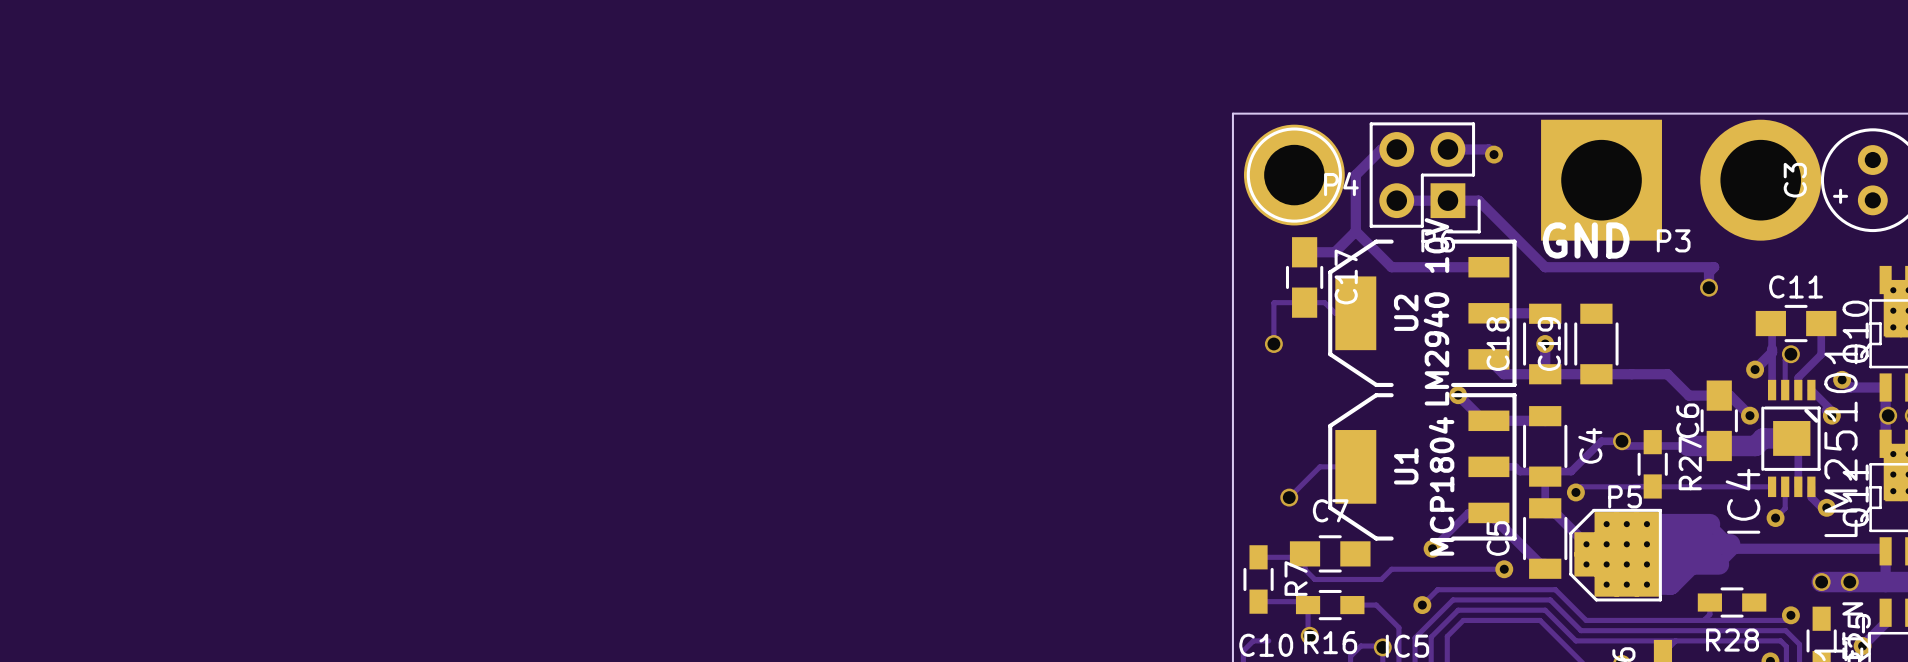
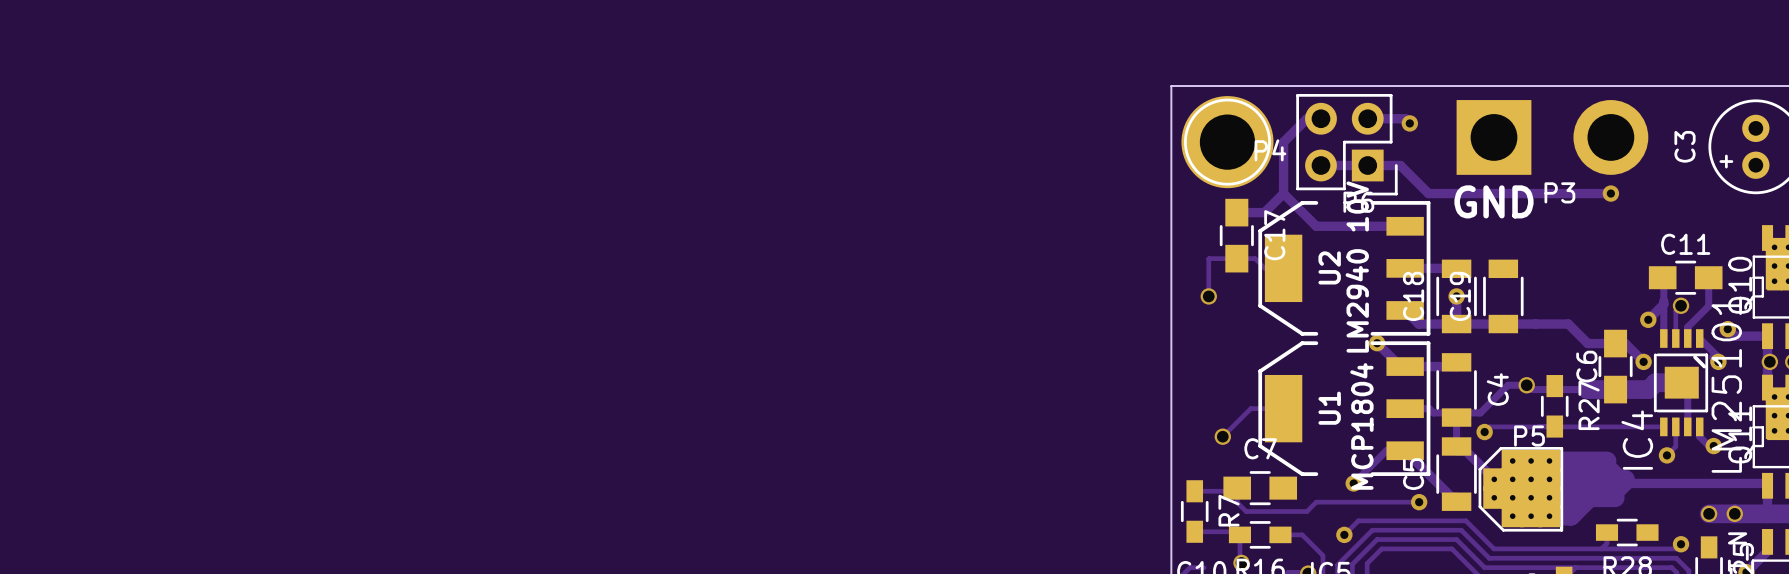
P3 footprint: [1541, 119, 1822, 241] -> [1456, 100, 1649, 175]
track: (1478, 200) (1545, 267) (1714, 267) (1709, 272) (1709, 287) -> (1395, 165) (1400, 165) (1428, 193) (1610, 193)
via: none -> (1610, 193)
via: (1709, 287) -> none

